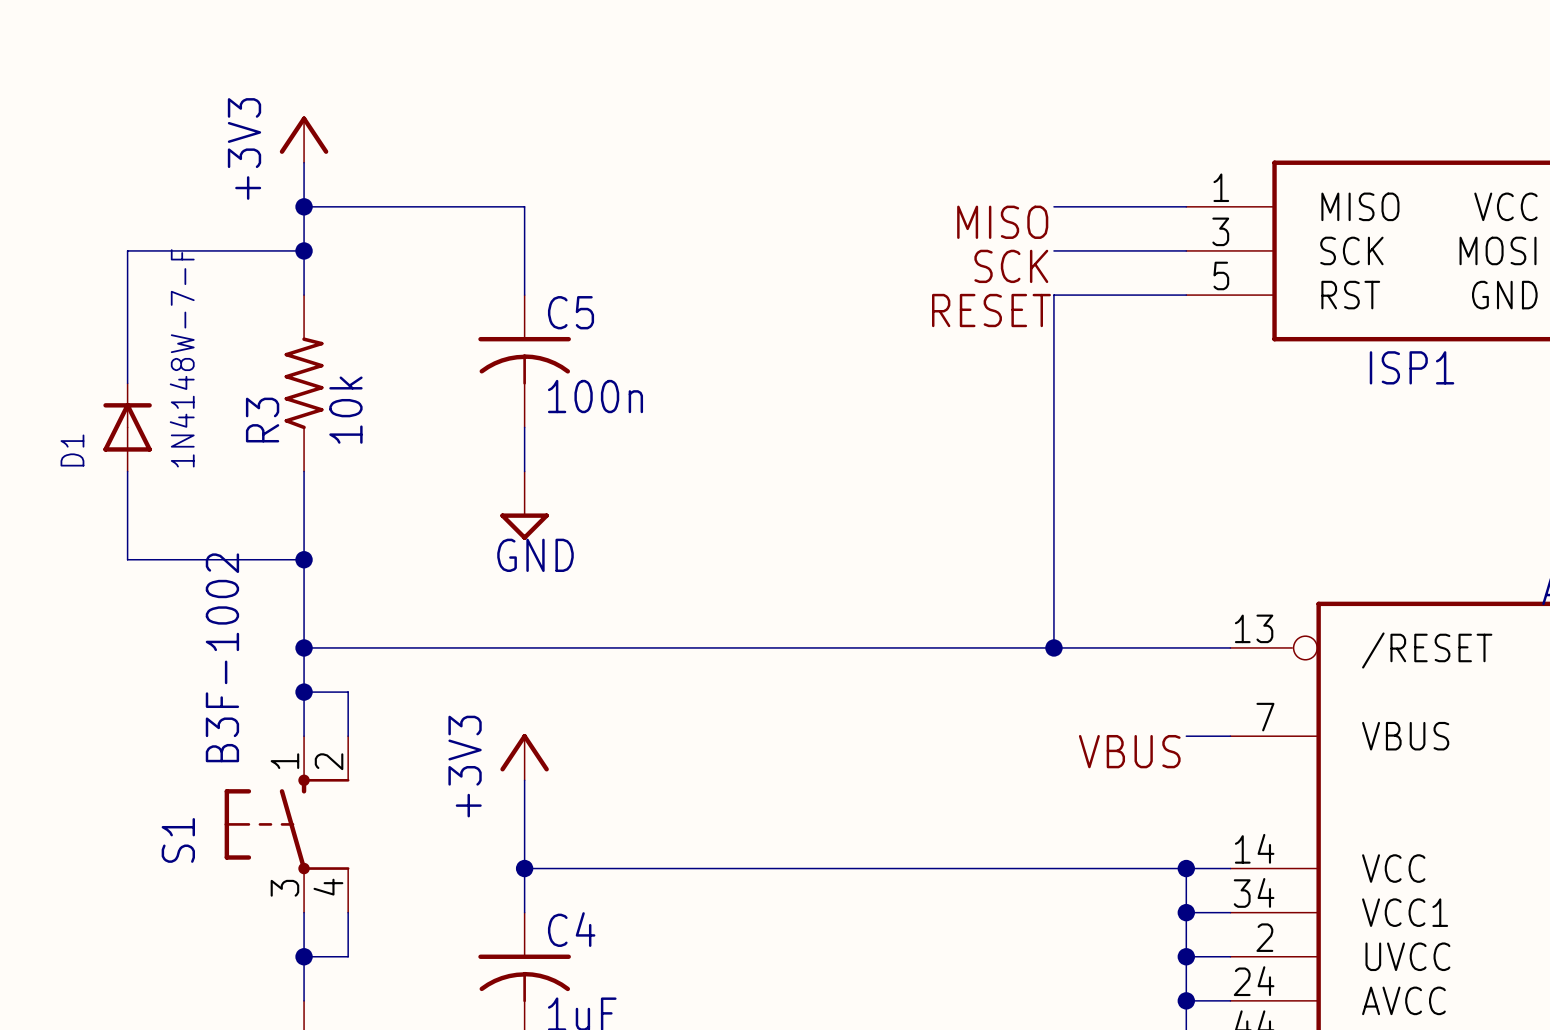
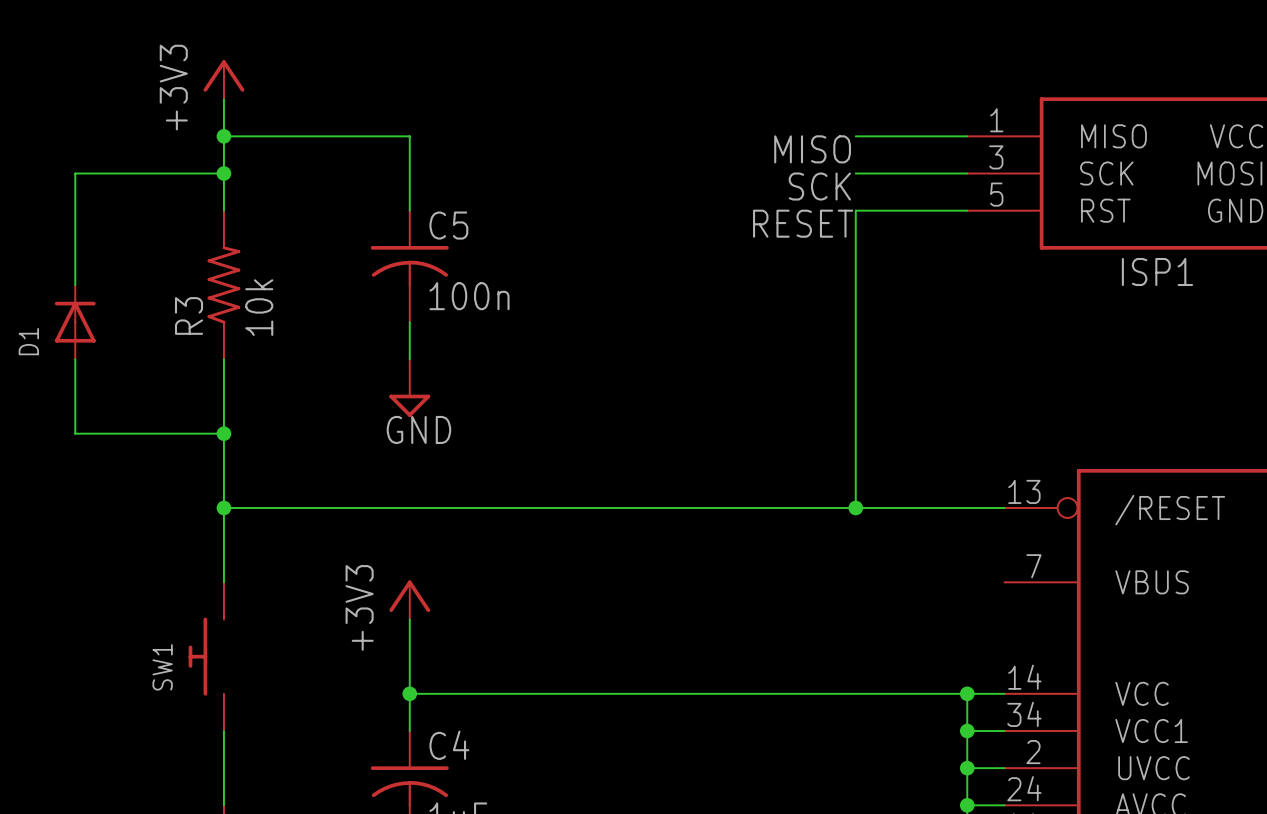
D1 value: 1N4148W-7-F (182, 358) -> none
wire: (304, 692) (348, 692) (348, 736) -> none
junction: (304, 692) -> none
wire: (1186, 736) (1230, 736) -> none
label: VBUS (1129, 751) -> none
SW1: none -> (206, 656)
S1: B3F-1002 (287, 824) -> none
wire: (348, 912) (348, 956) (304, 956) -> none
junction: (304, 956) -> none

